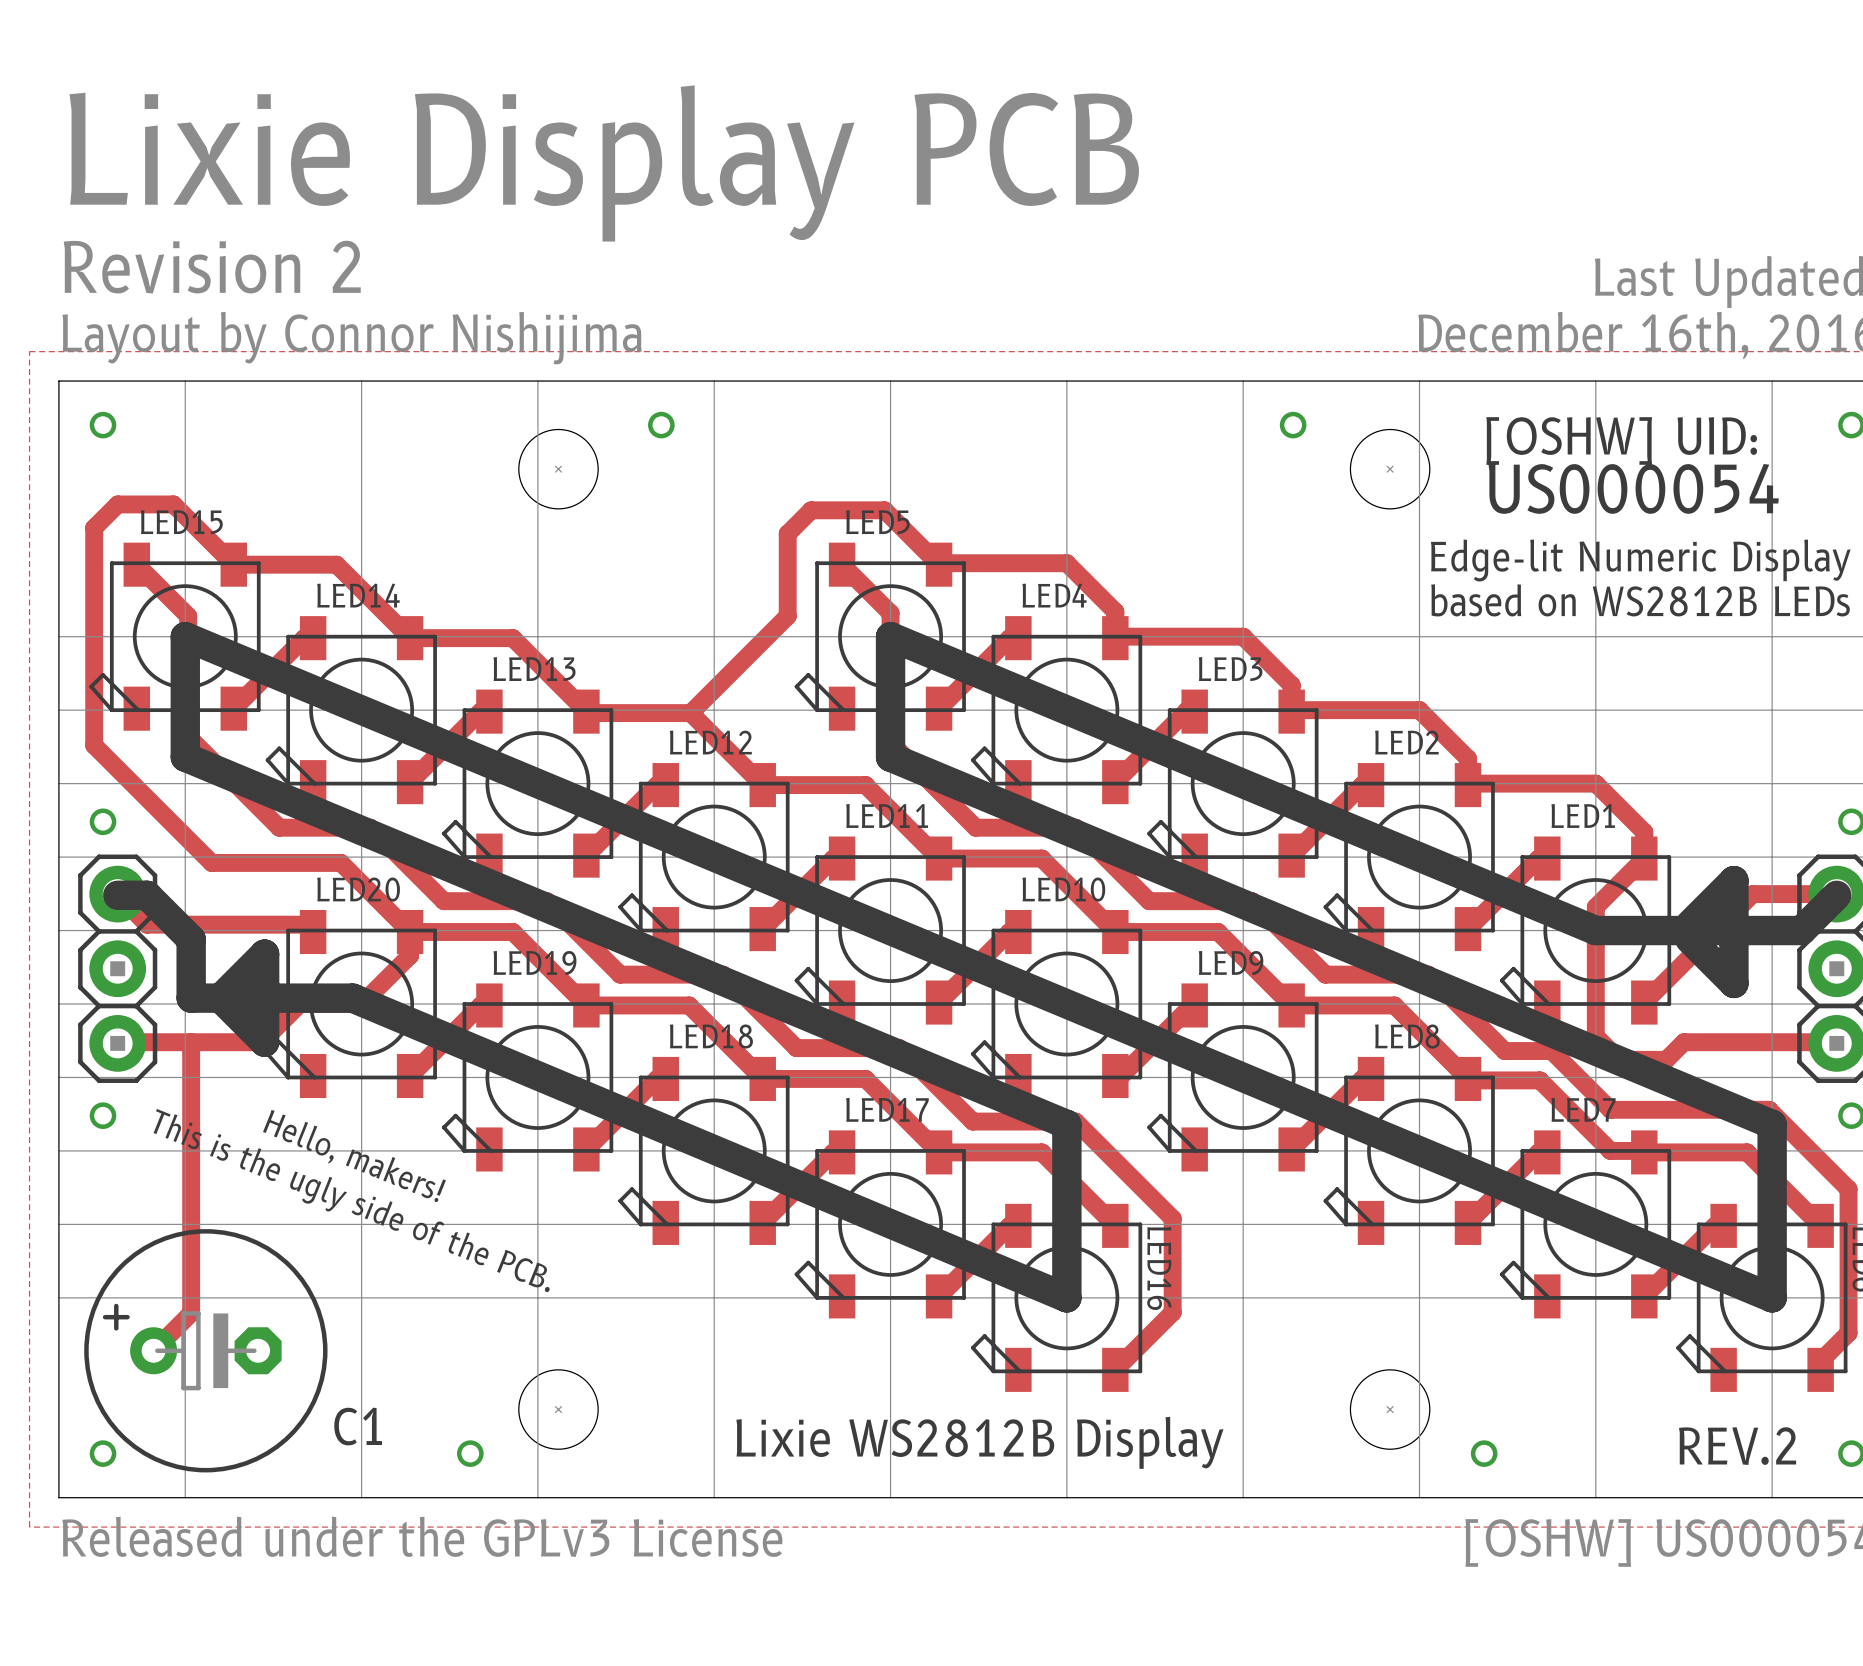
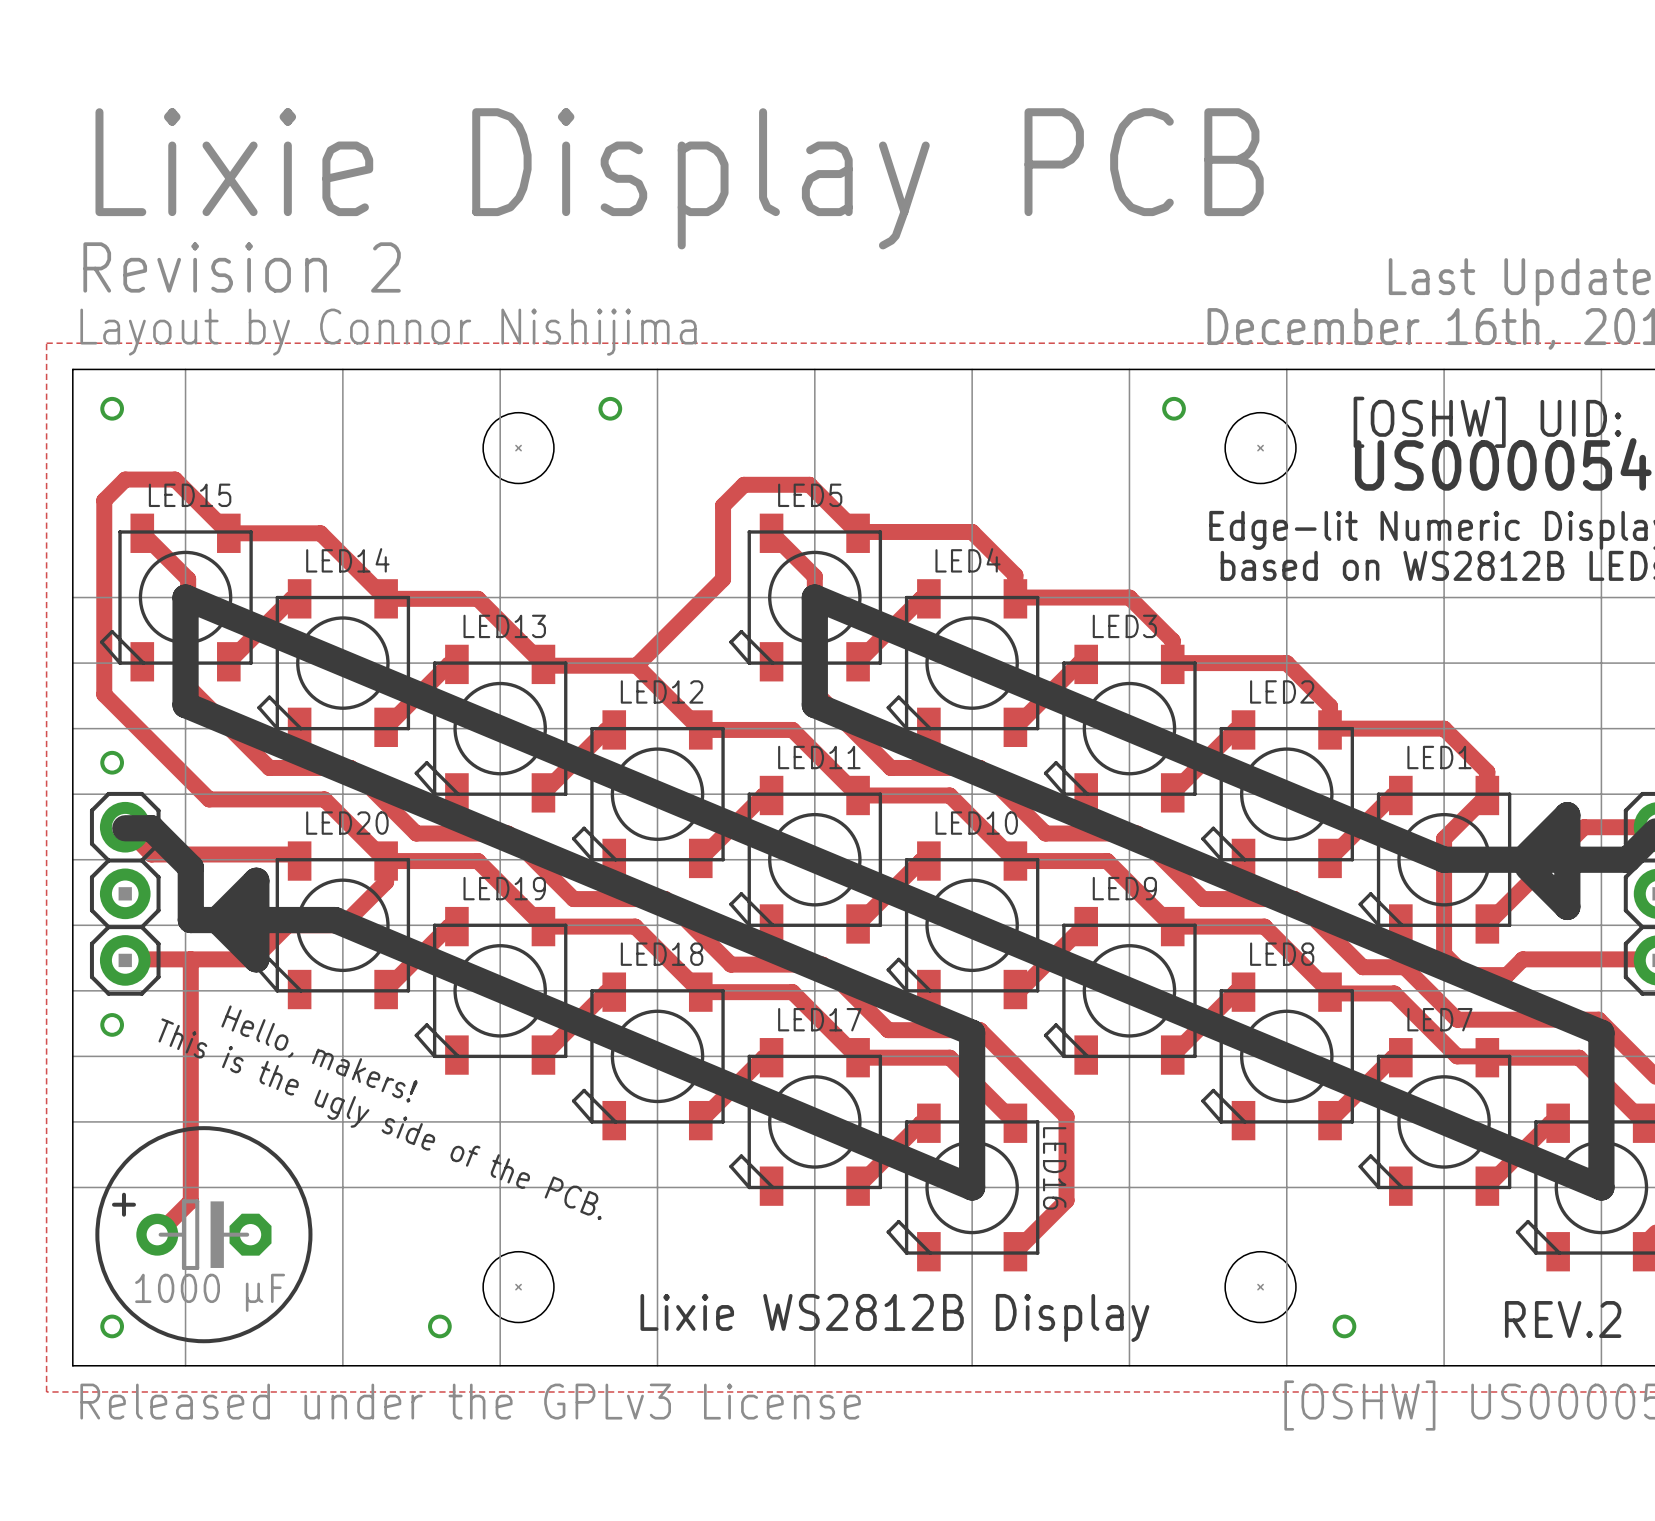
C1 value: none -> 1000 µF (210, 1292)
C1 name: C1 (358, 1426) -> none

